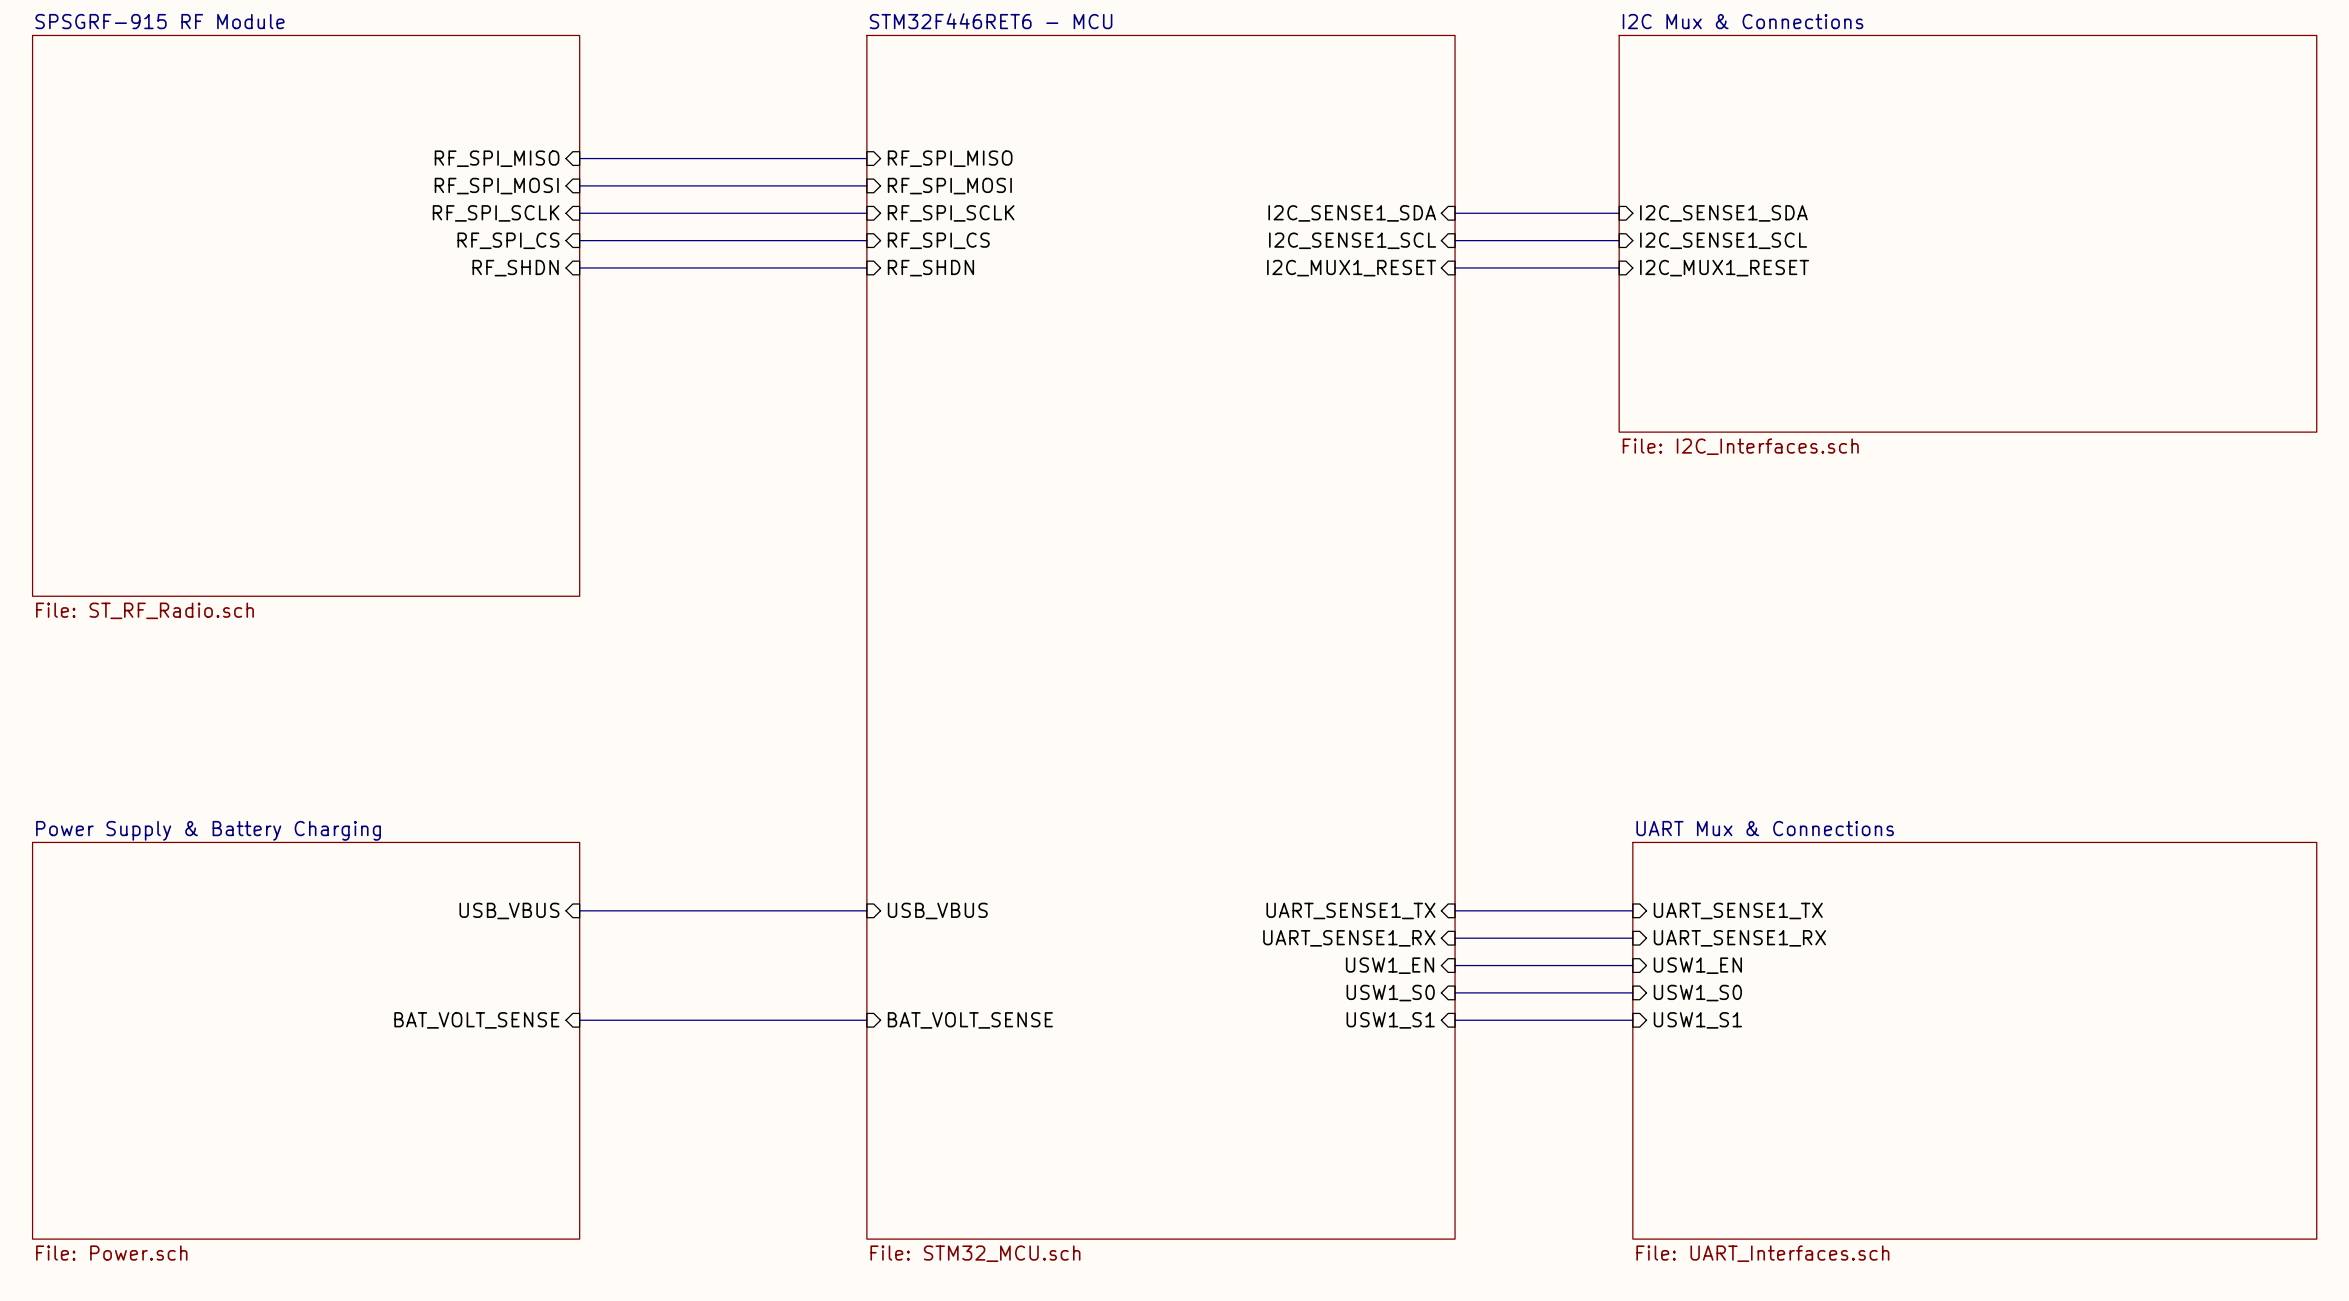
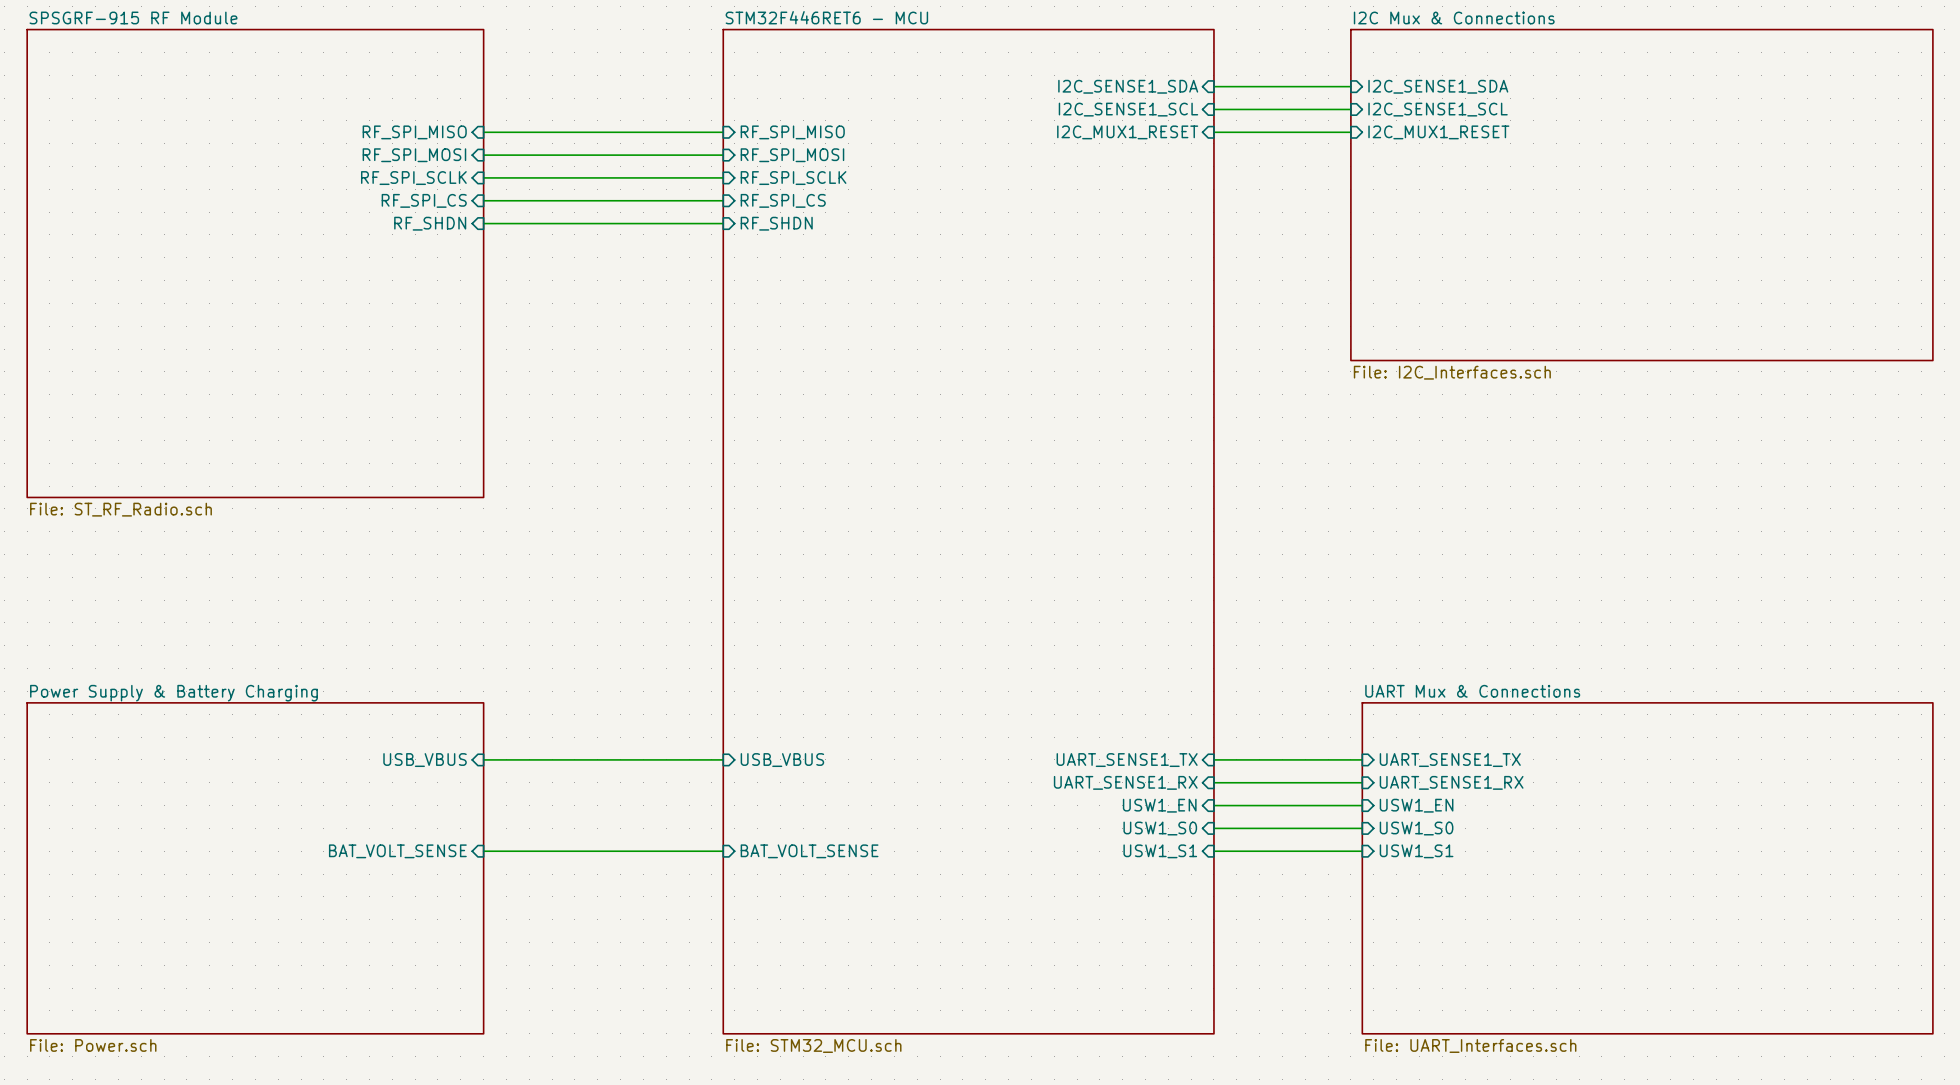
sheet pin position: I2C_SENSE1_SDA (1352, 213) -> I2C_SENSE1_SDA (1128, 86)
wire: (1455, 213) (1619, 213) -> (1213, 86) (1350, 86)
sheet pin position: I2C_SENSE1_SDA (1723, 213) -> I2C_SENSE1_SDA (1438, 86)
sheet pin position: I2C_SENSE1_SCL (1352, 240) -> I2C_SENSE1_SCL (1128, 109)
wire: (1455, 240) (1619, 240) -> (1213, 109) (1350, 109)
sheet pin position: I2C_SENSE1_SCL (1723, 240) -> I2C_SENSE1_SCL (1438, 109)
wire: (1455, 267) (1619, 267) -> (1213, 132) (1350, 132)
sheet pin position: I2C_MUX1_RESET (1351, 268) -> I2C_MUX1_RESET (1127, 132)
sheet pin position: I2C_MUX1_RESET (1724, 268) -> I2C_MUX1_RESET (1438, 132)

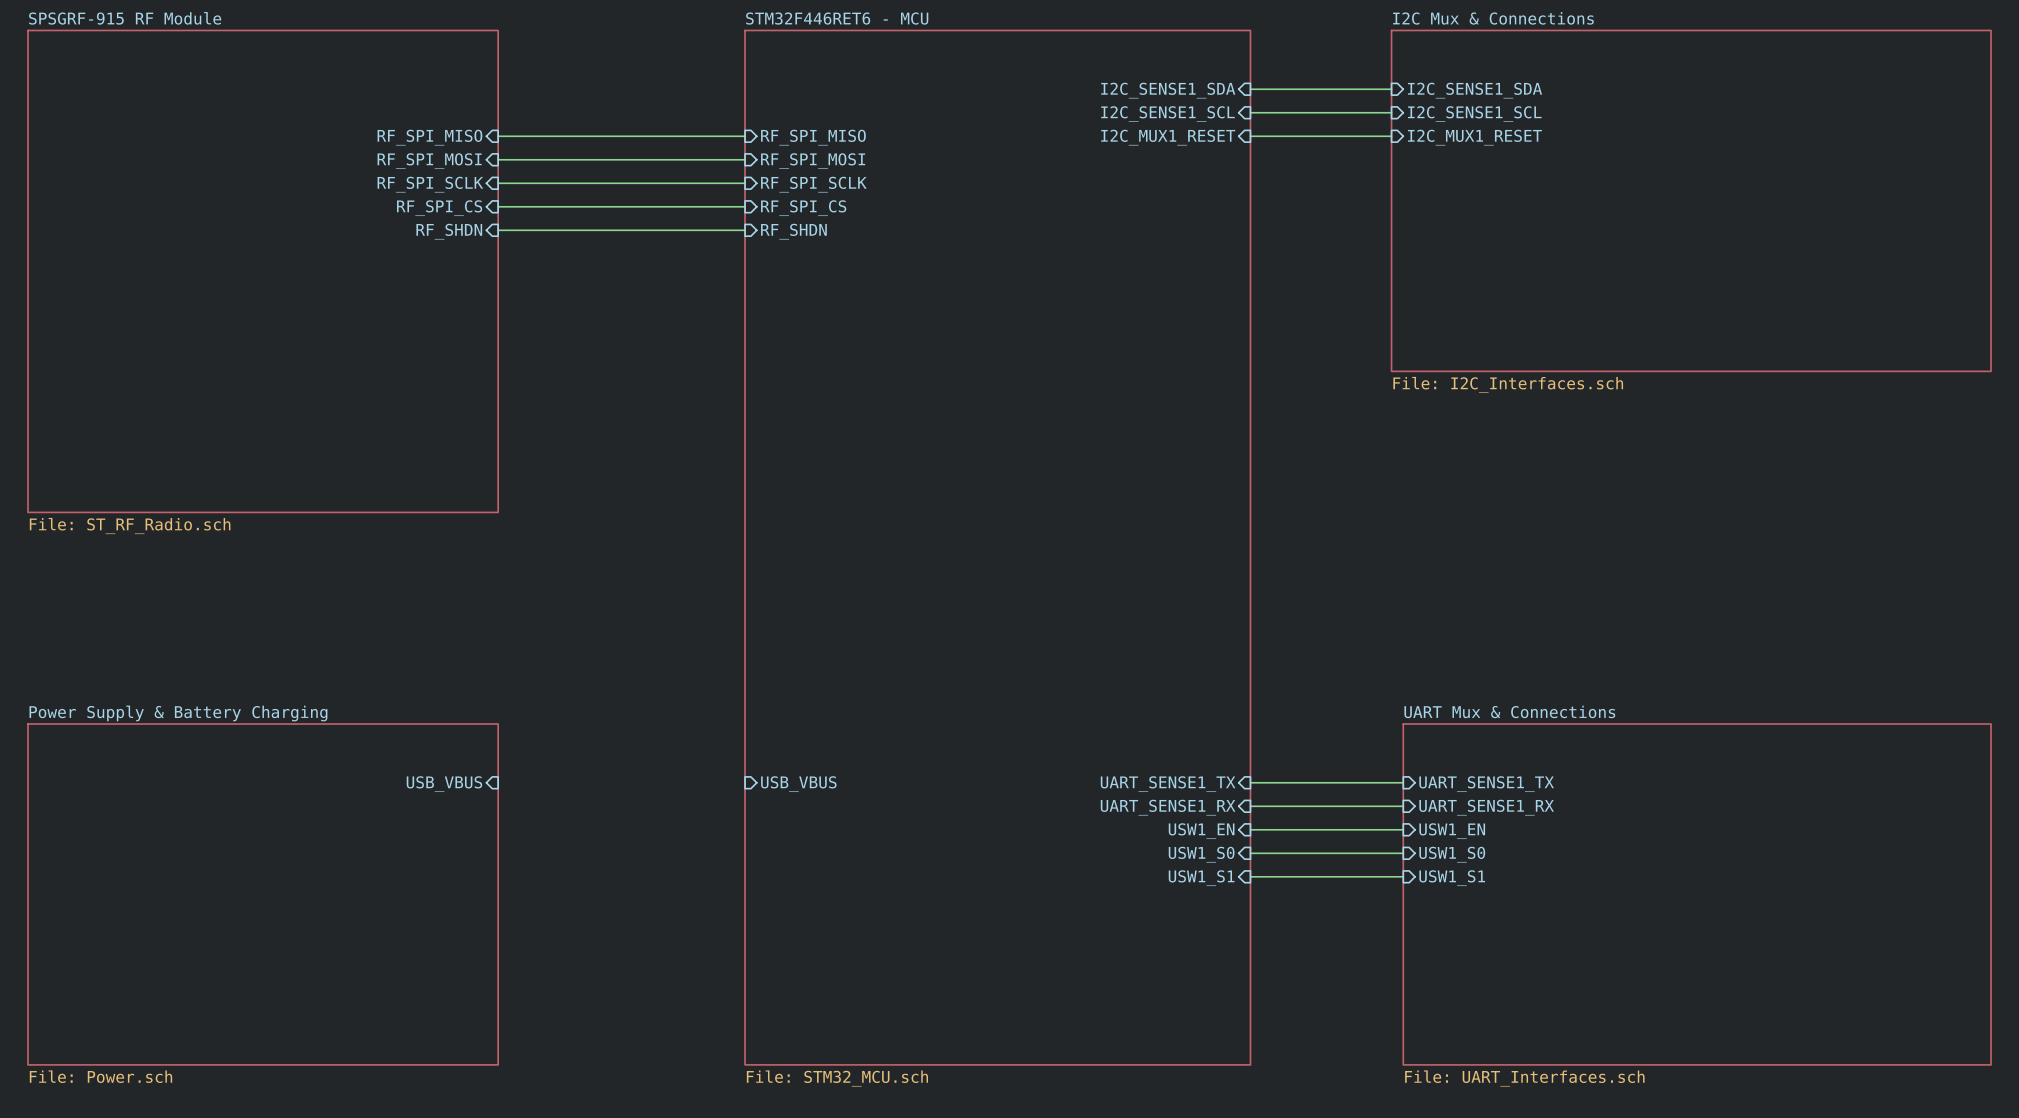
wire: (483, 759) (723, 759) -> none
sheet pin: BAT_VOLT_SENSE (397, 851) -> none
wire: (483, 851) (723, 851) -> none
sheet pin: BAT_VOLT_SENSE (809, 851) -> none

